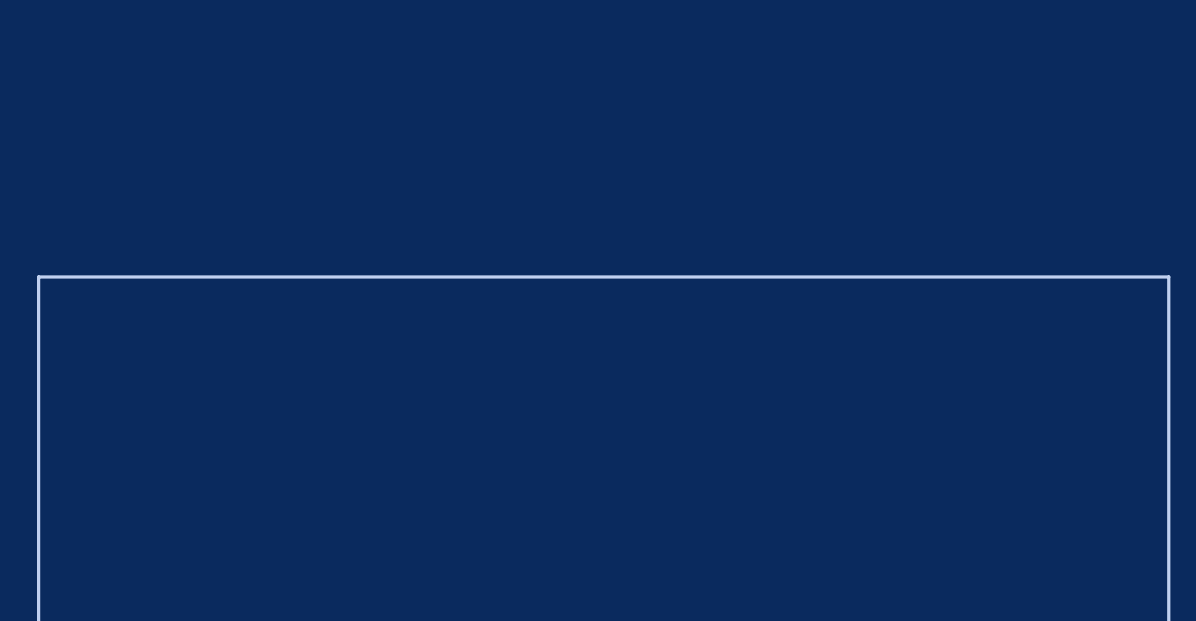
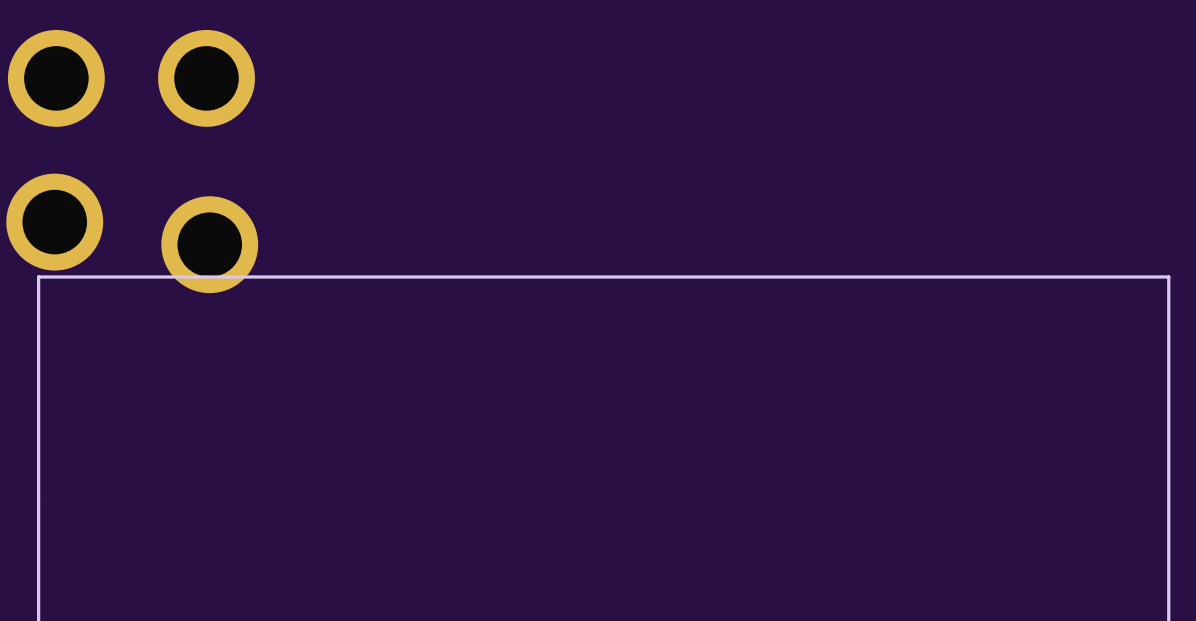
part: none -> (56, 78)
part: none -> (206, 78)
part: none -> (54, 222)
part: none -> (209, 244)

